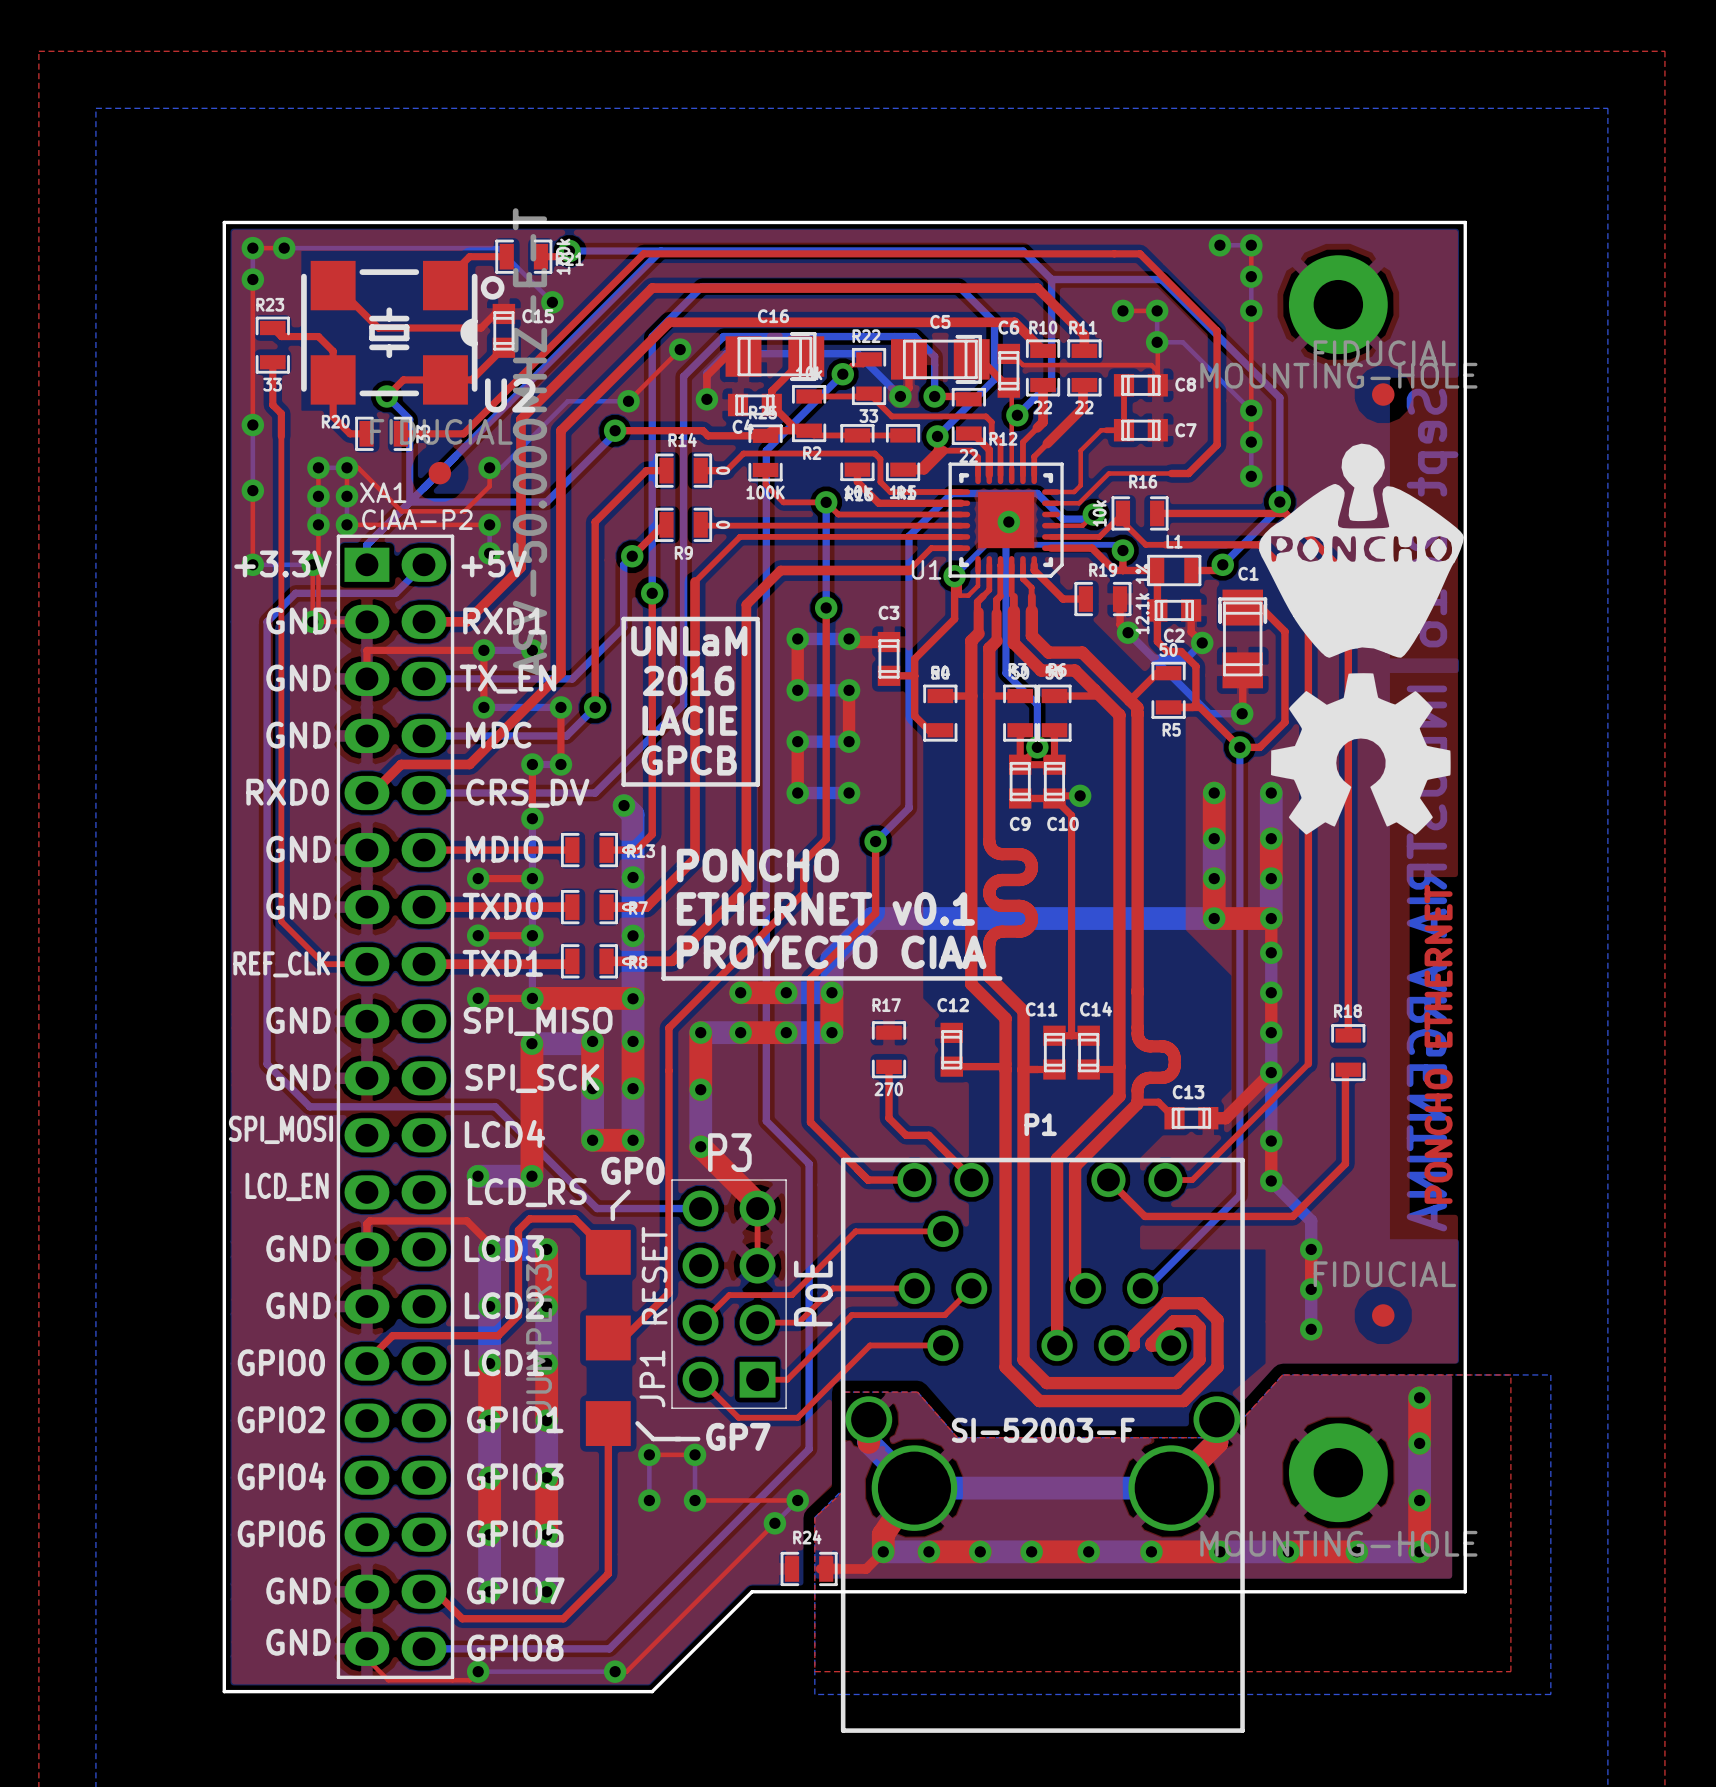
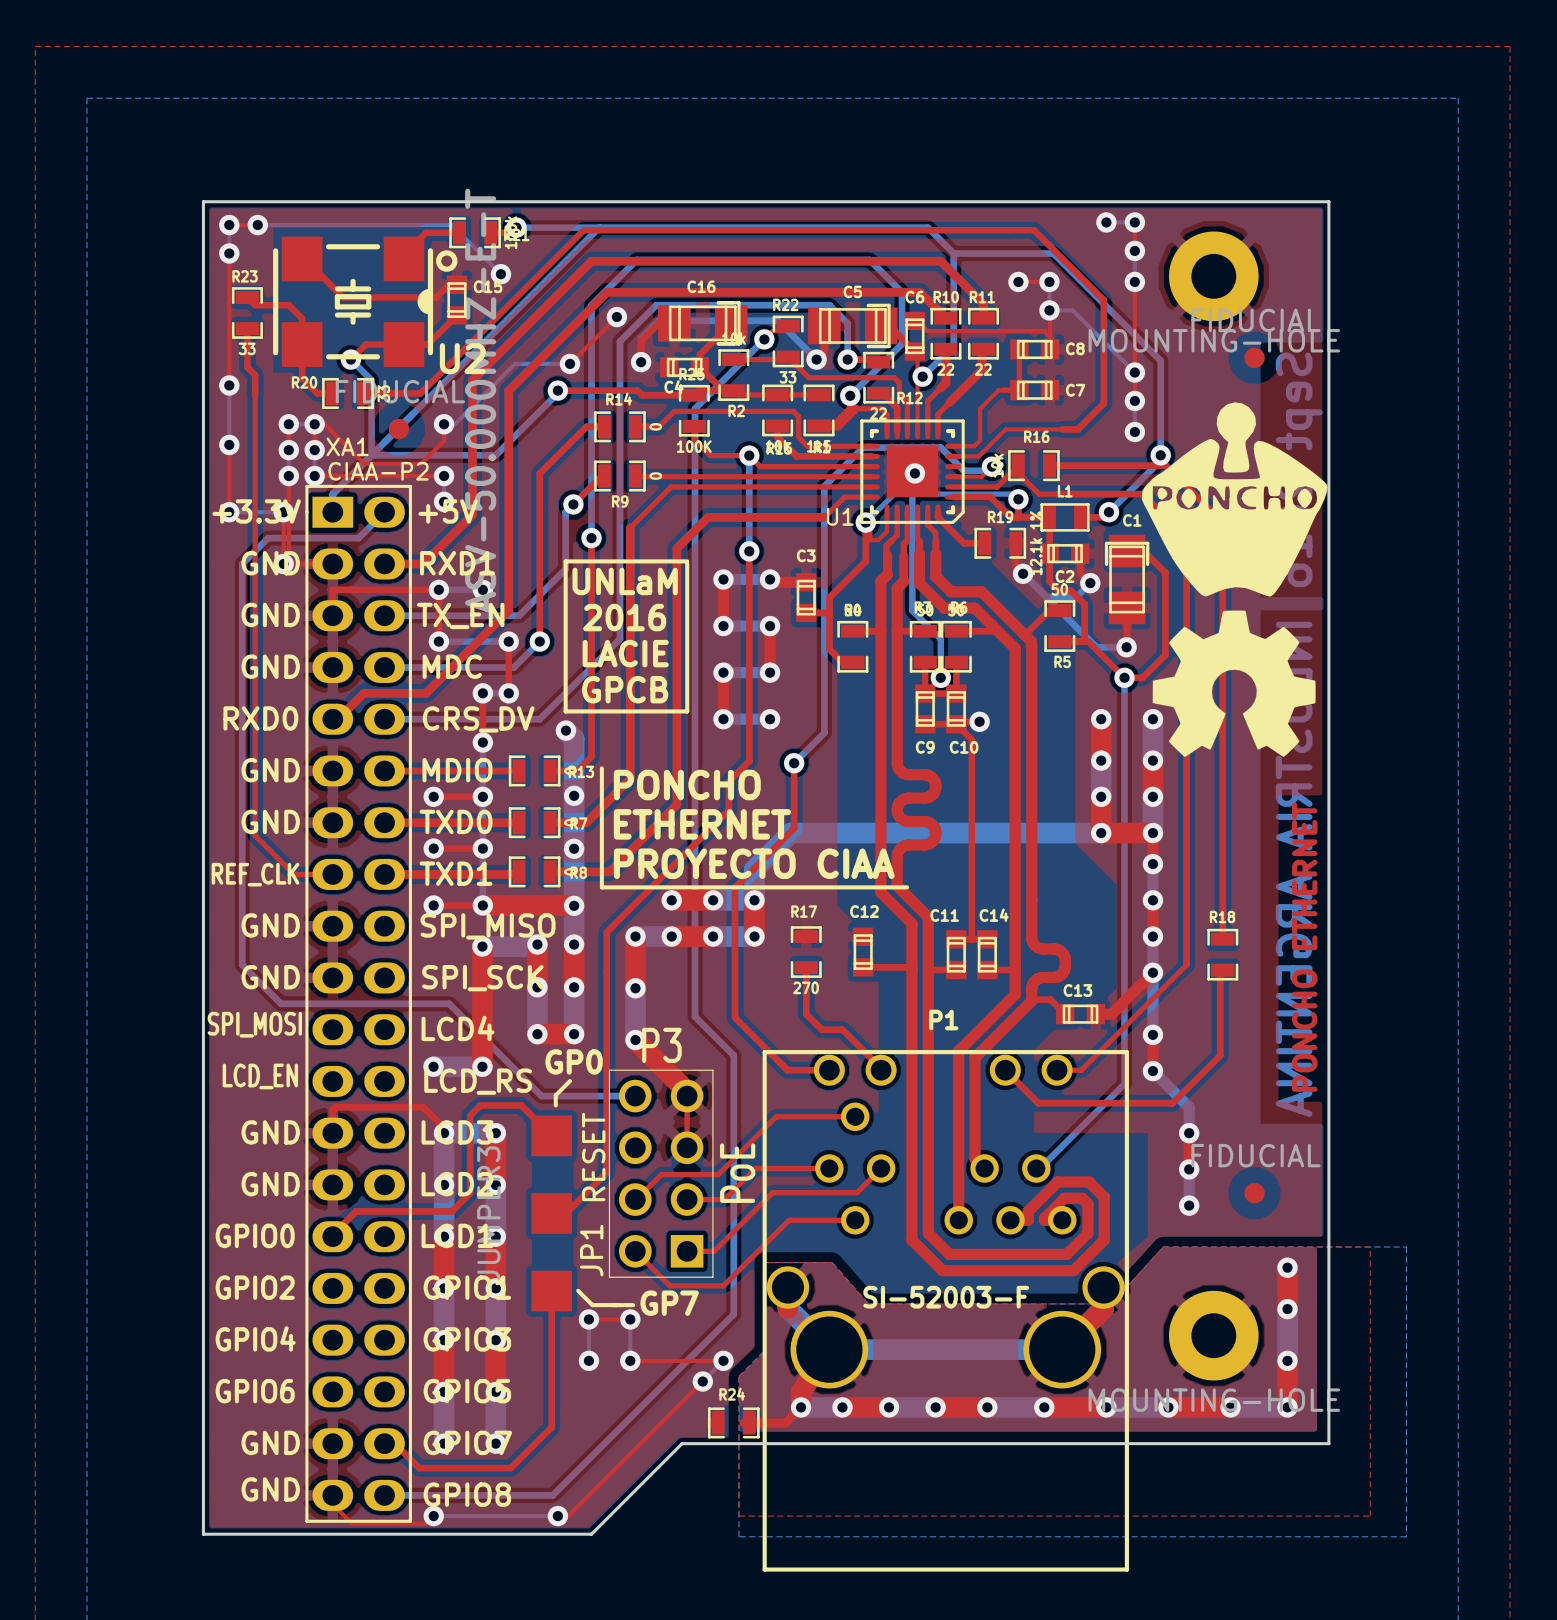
text: ETHERNET v0.1 (825, 908) -> ETHERNET (702, 824)

